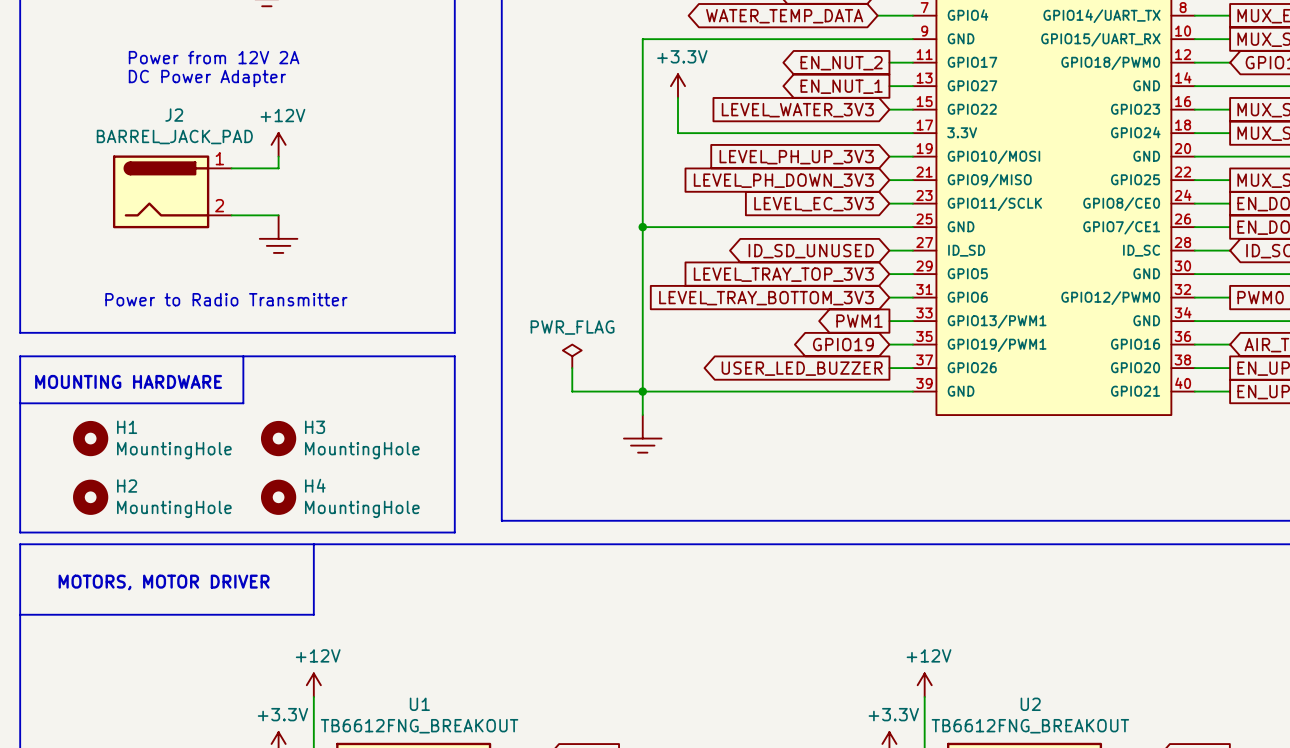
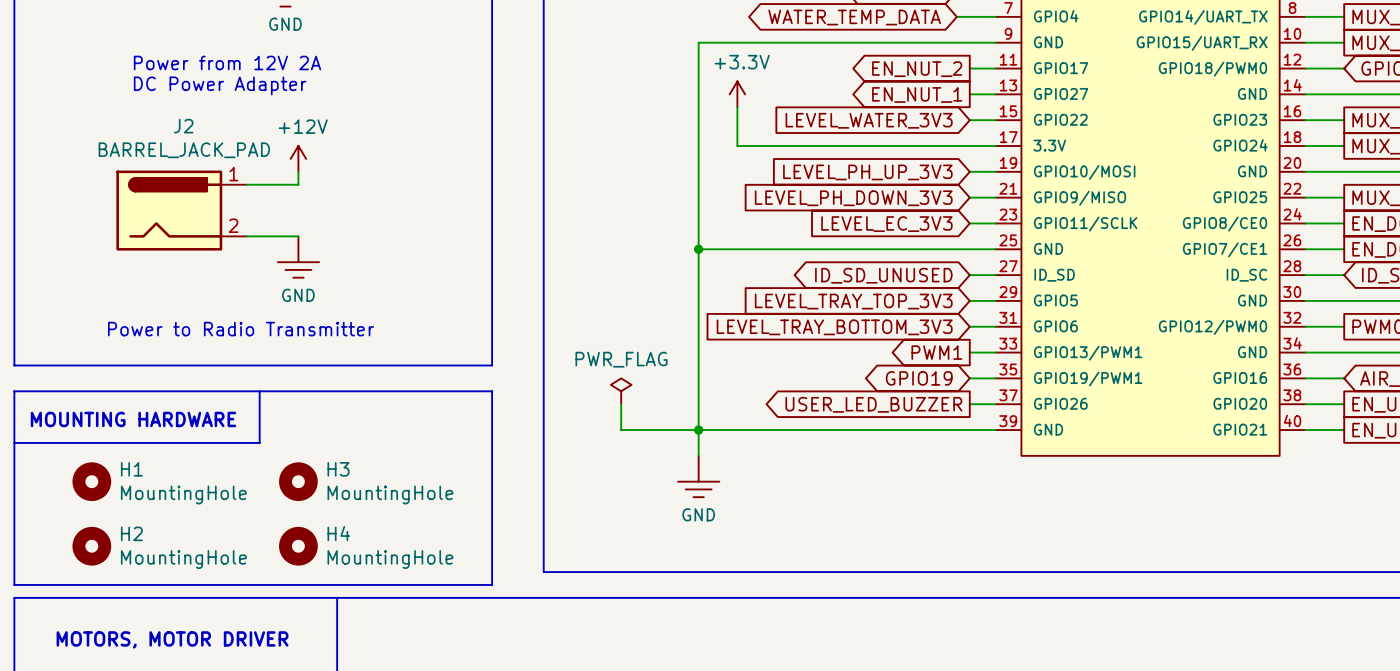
power symbol text: none -> GND (285, 24)
power symbol text: none -> GND (298, 295)
power symbol text: none -> GND (698, 514)

